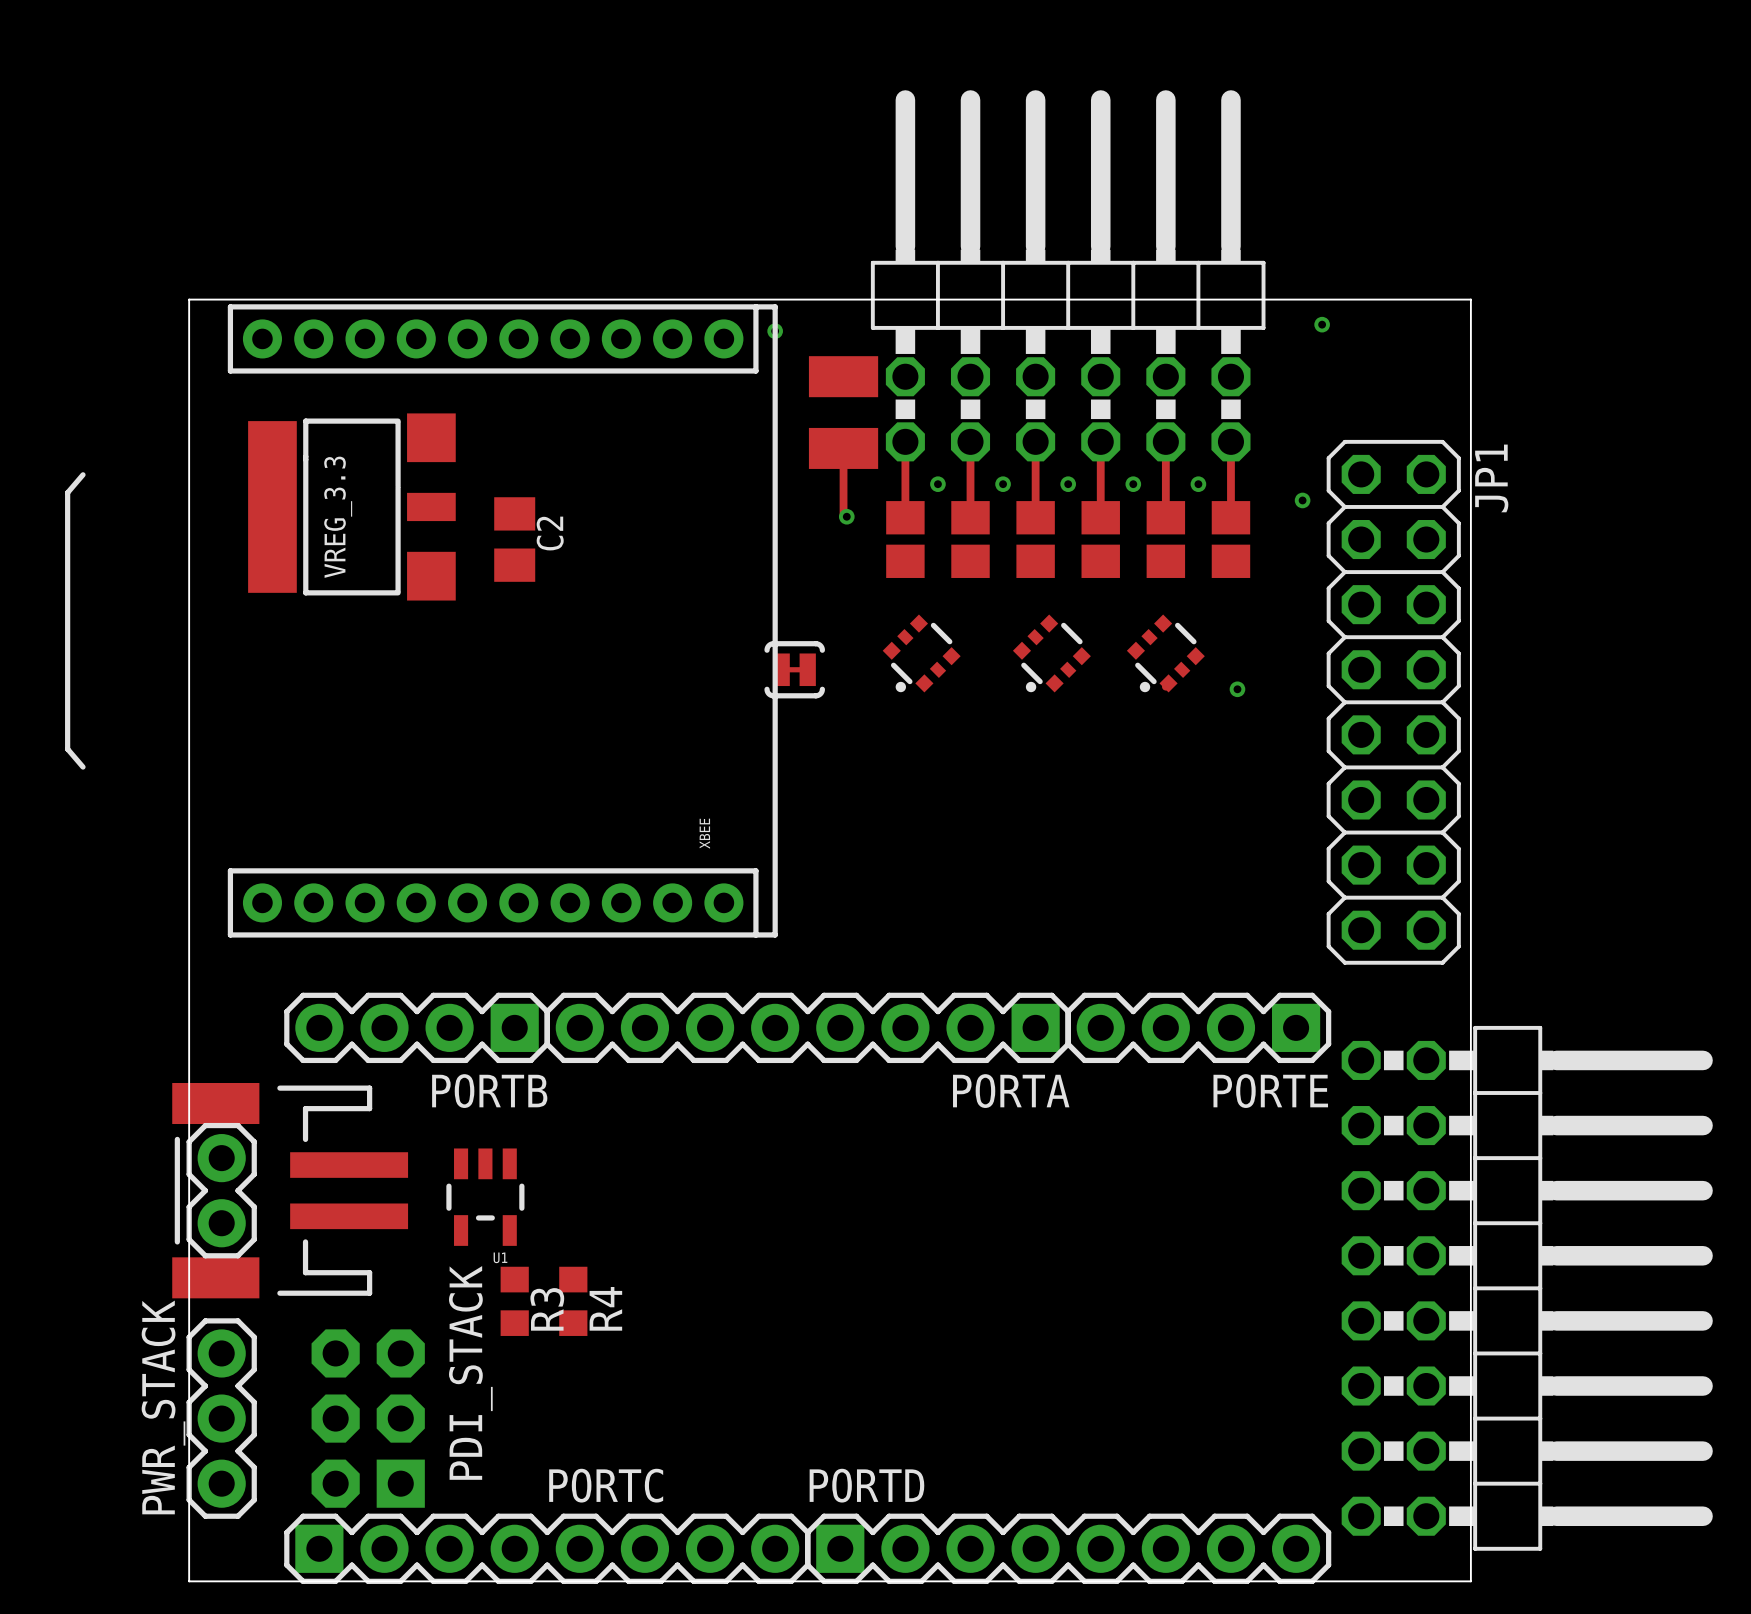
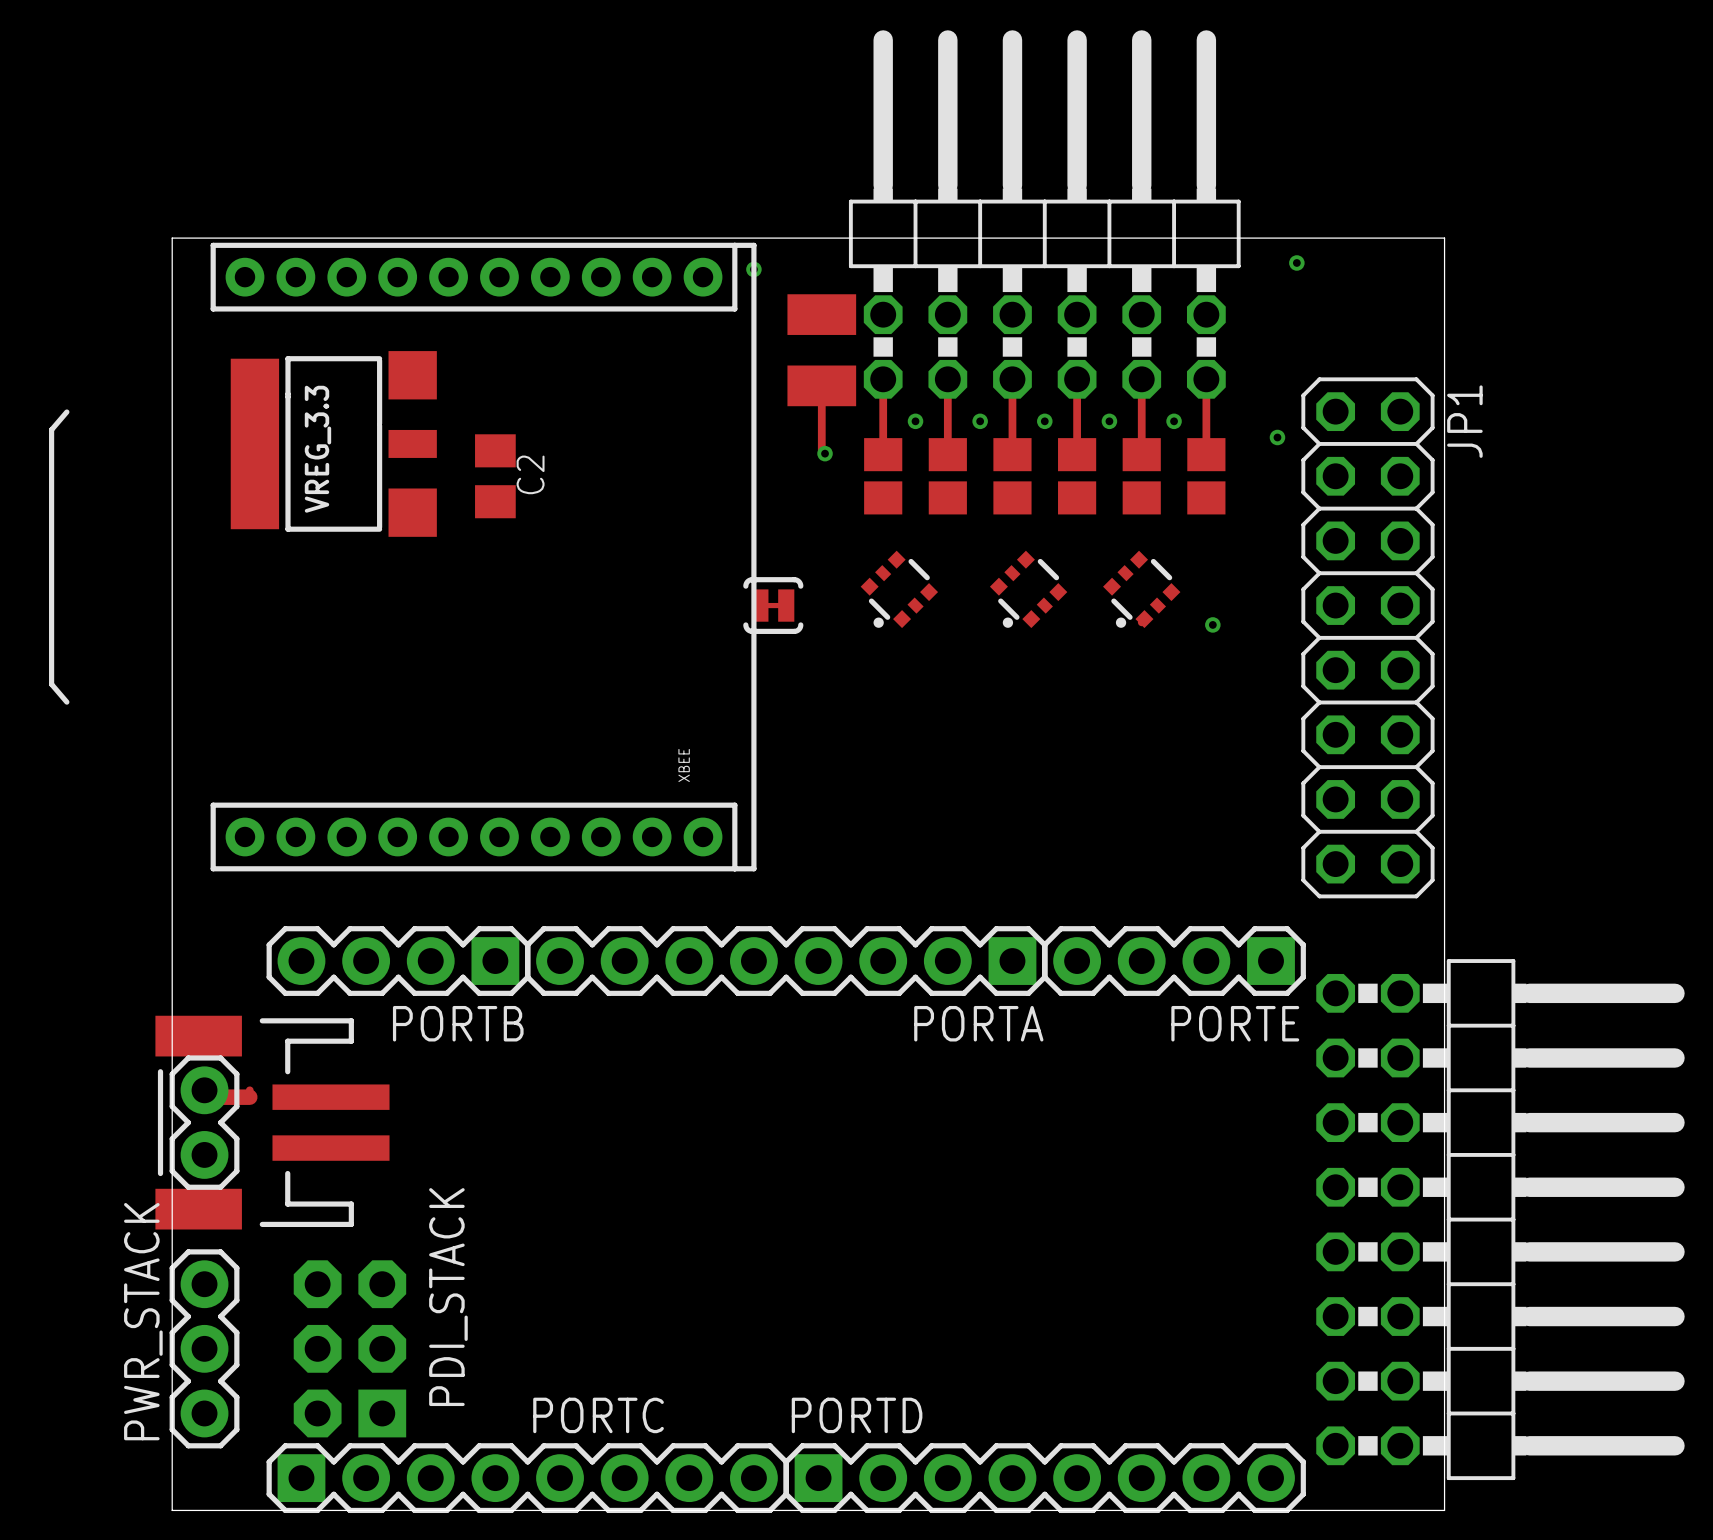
track: none -> (204, 1090) (204, 1097) (249, 1097) (249, 1090)
U1: (485, 1197) -> none
R3: (514, 1301) -> none
R4: (573, 1301) -> none

